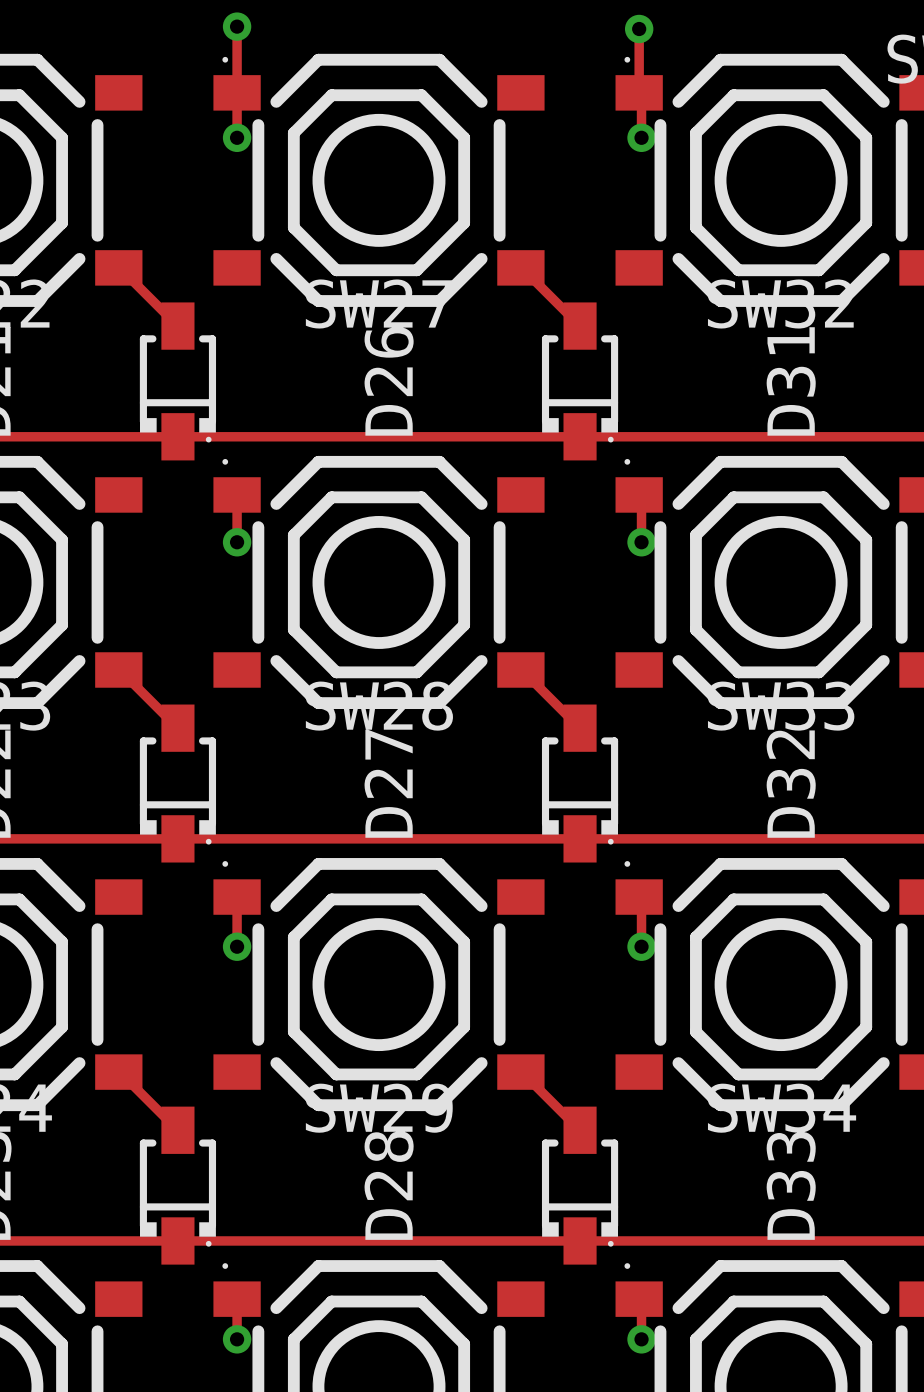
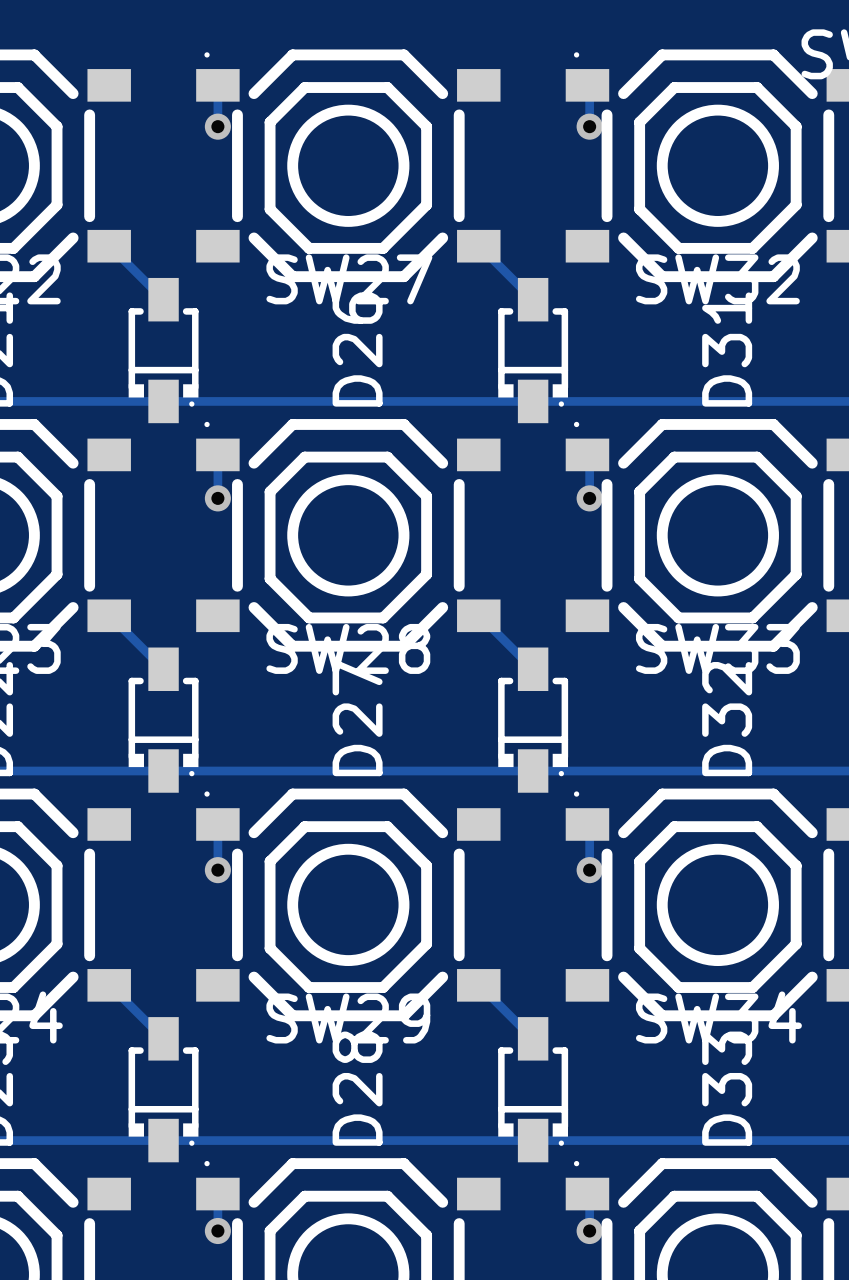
track: (237, 26) (237, 92) -> none
via: (237, 26) -> none
track: (639, 29) (639, 92) -> none
via: (639, 29) -> none

